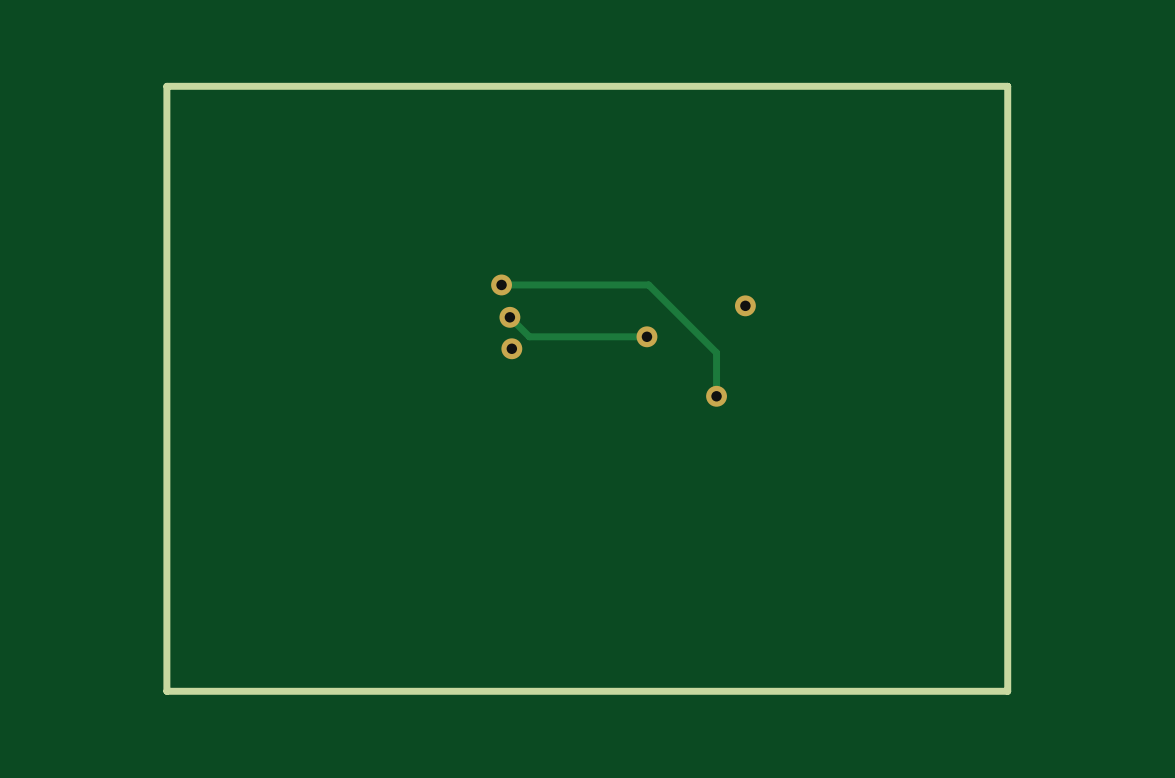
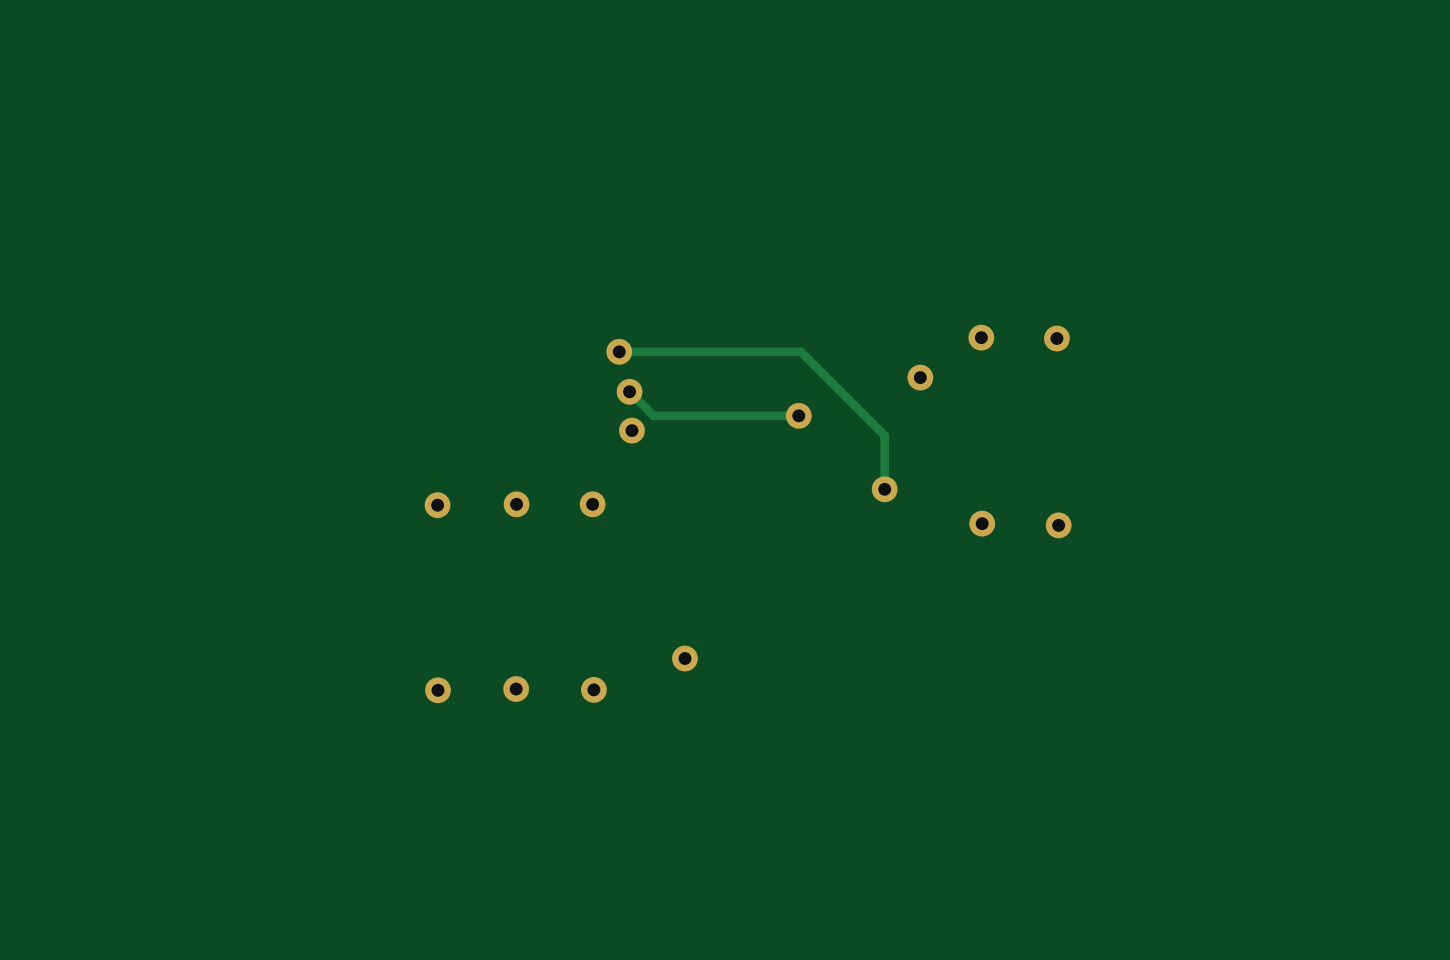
board edge: (1007, 86) (166, 86) (166, 691) (1007, 691) (1007, 86) -> none
via: none -> (981, 337)
via: none -> (1056, 338)
via: none -> (516, 504)
via: none -> (592, 504)
via: none -> (437, 505)
via: none -> (982, 523)
via: none -> (1058, 525)
via: none -> (684, 658)
via: none -> (516, 689)
via: none -> (593, 689)
via: none -> (437, 690)

